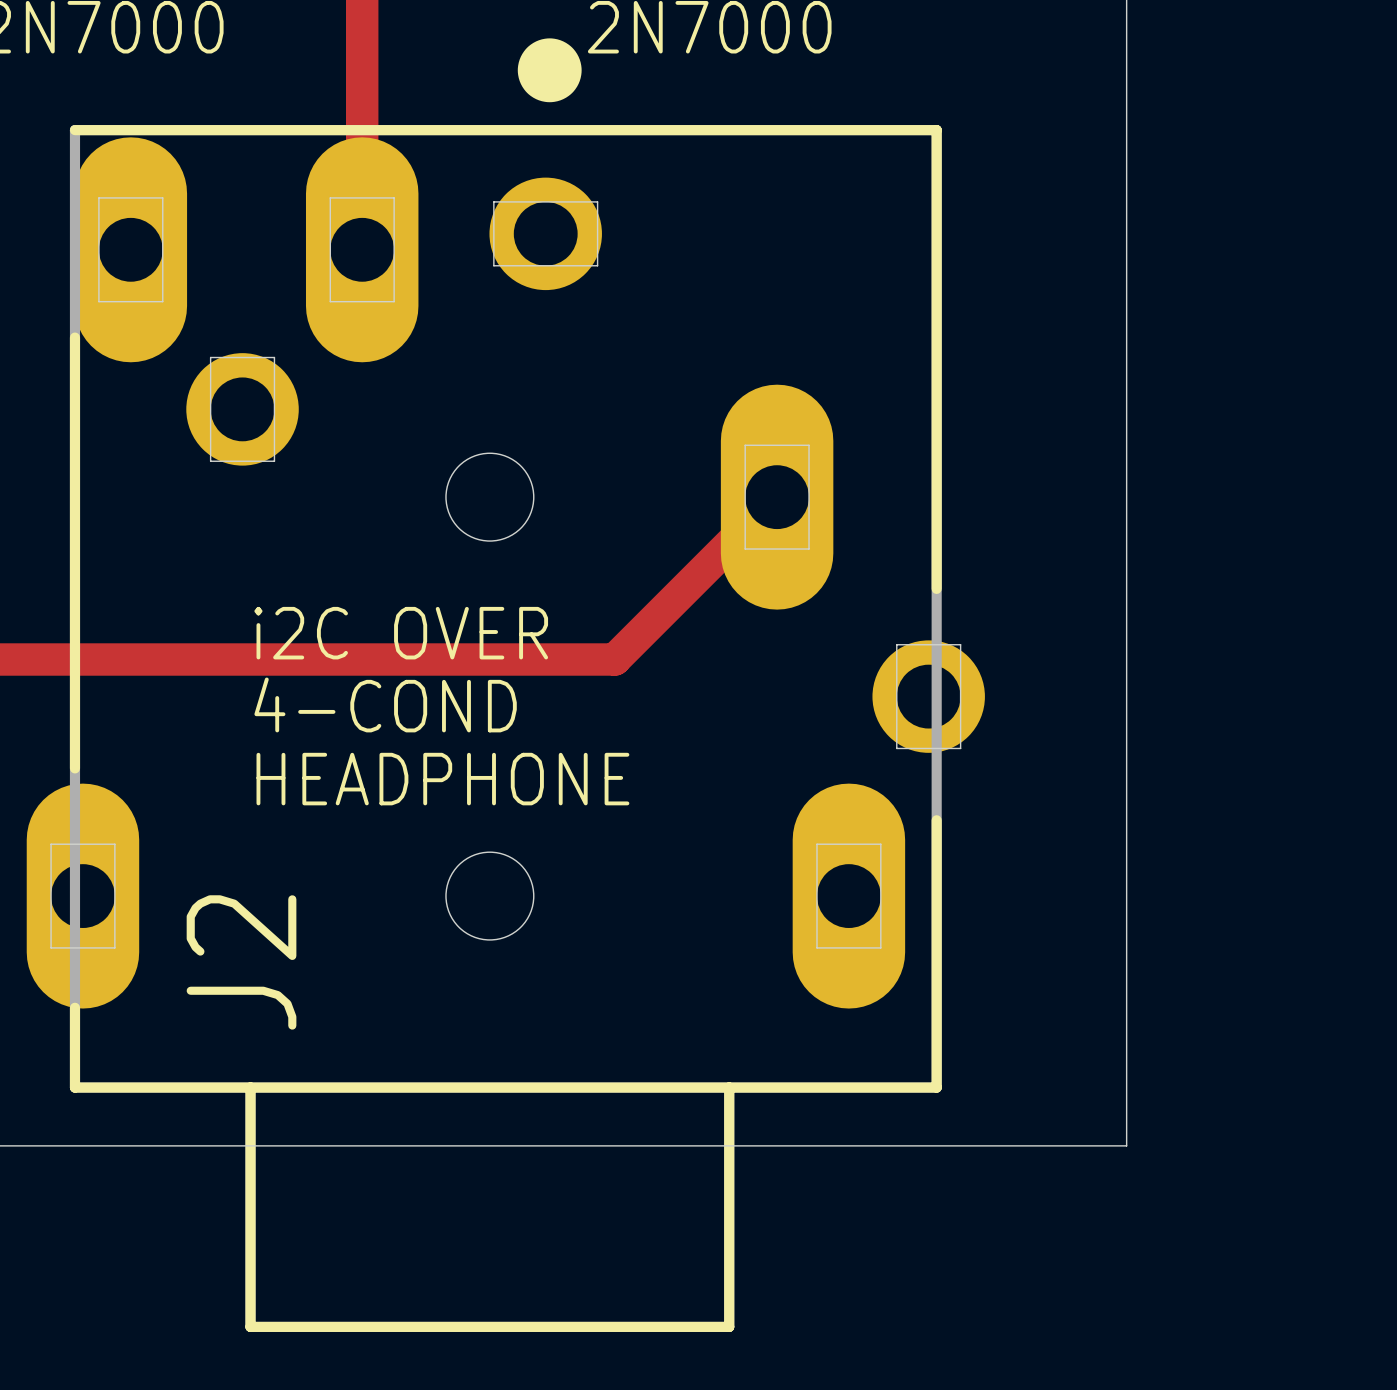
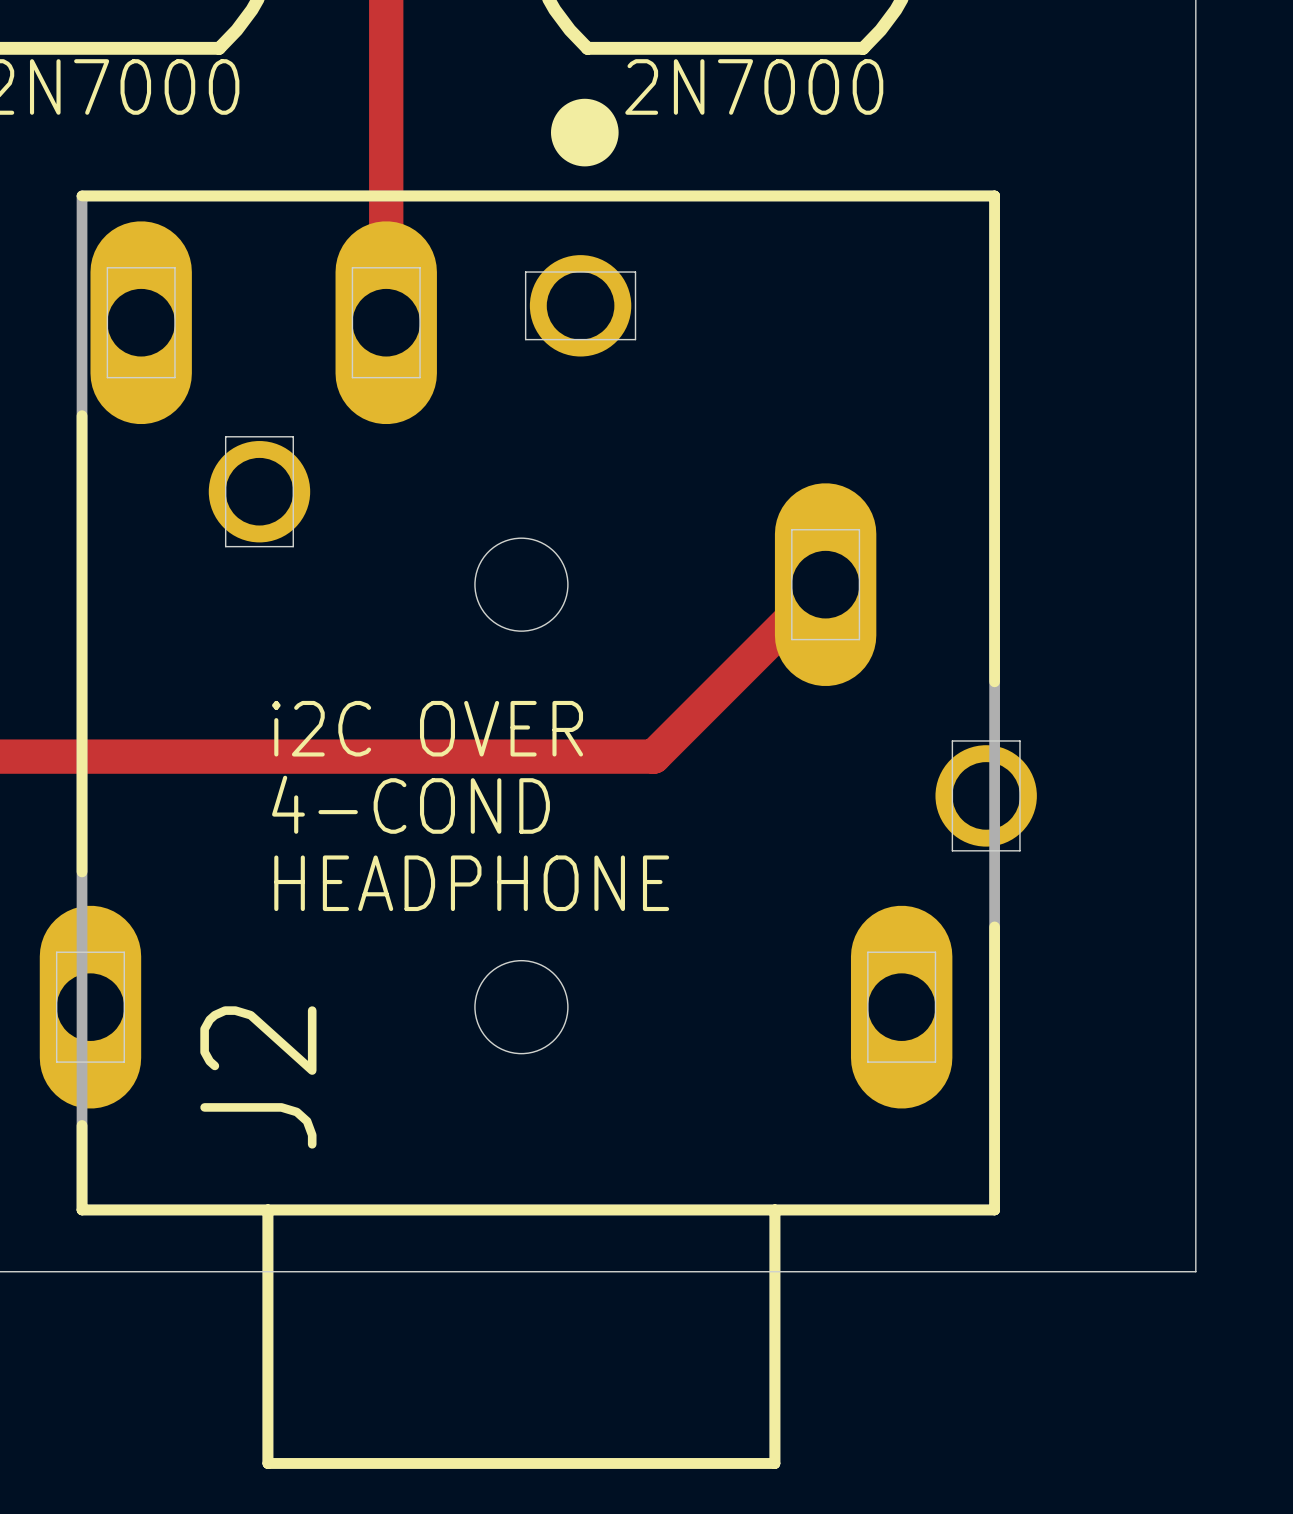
J2 footprint: [26, 38, 985, 1332] -> [39, 98, 1037, 1469]

